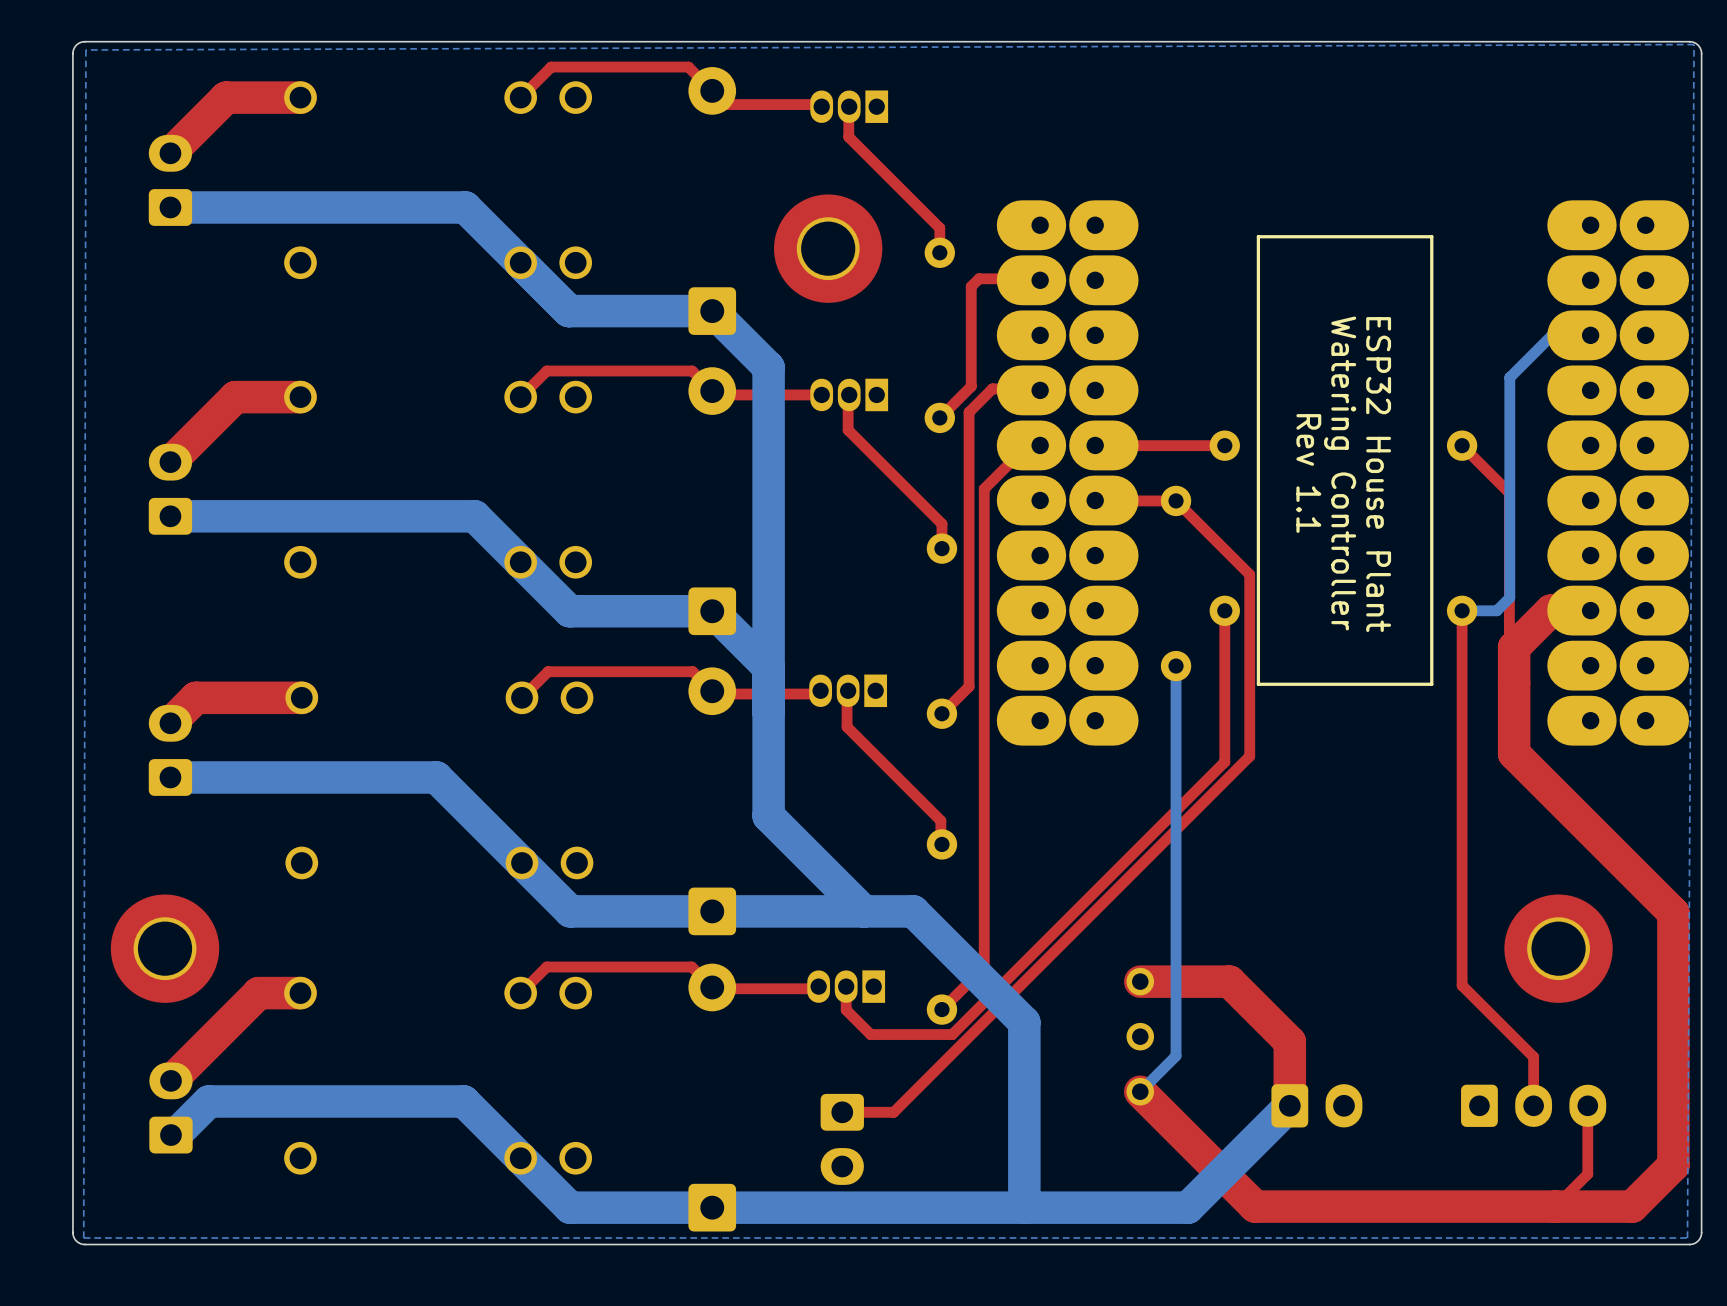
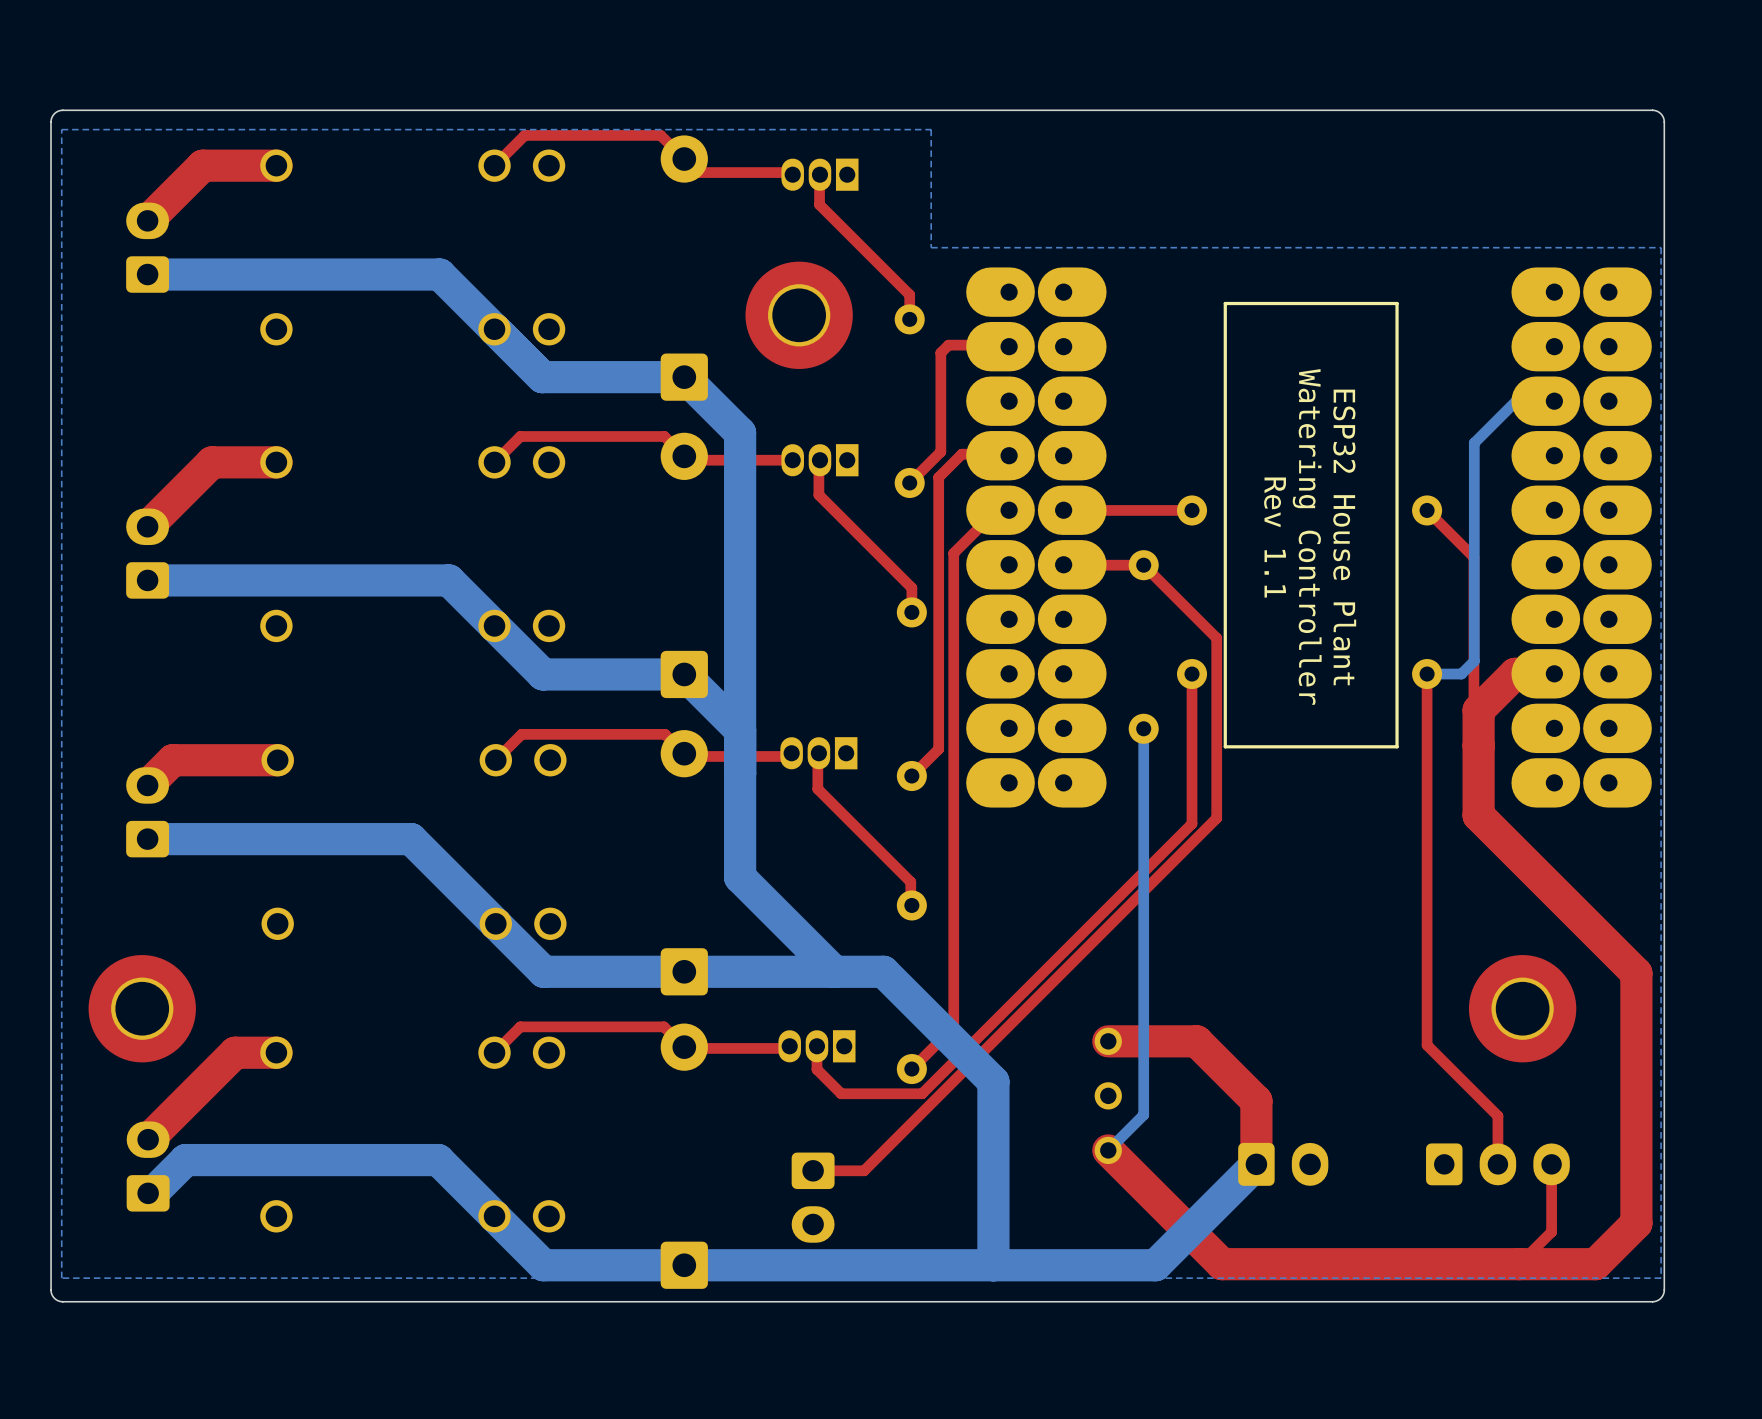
bottom zone outline: (1694, 44) (85, 49) (83, 1238) (1687, 1238) (1694, 44) -> (931, 129) (931, 247) (1661, 247) (1661, 1278) (61, 1278) (61, 129) (931, 129)

